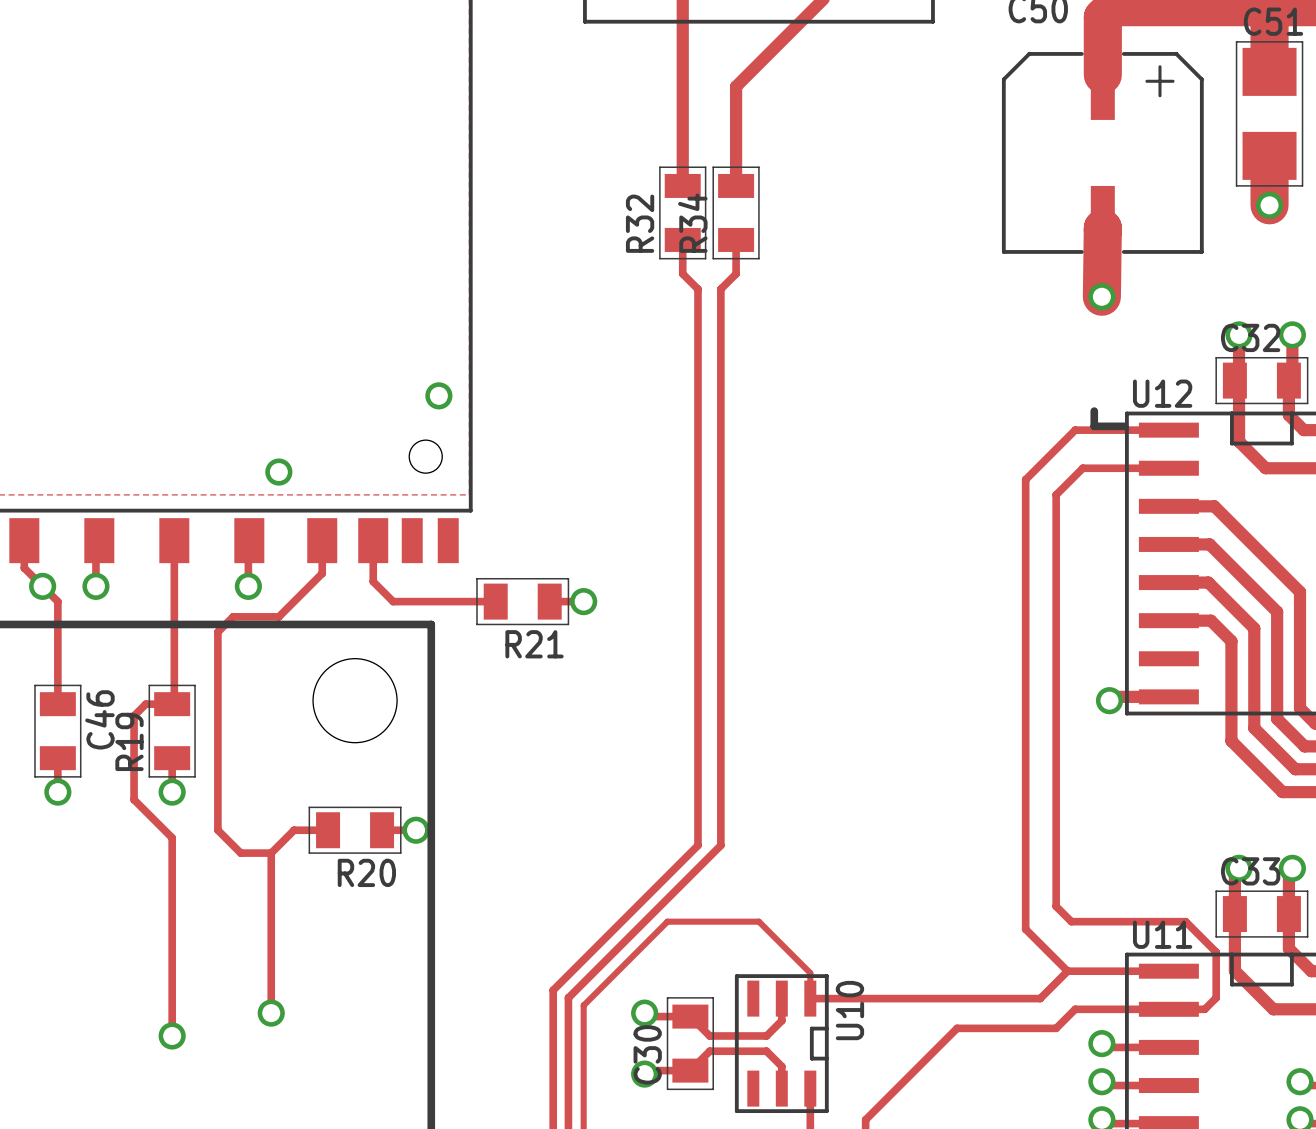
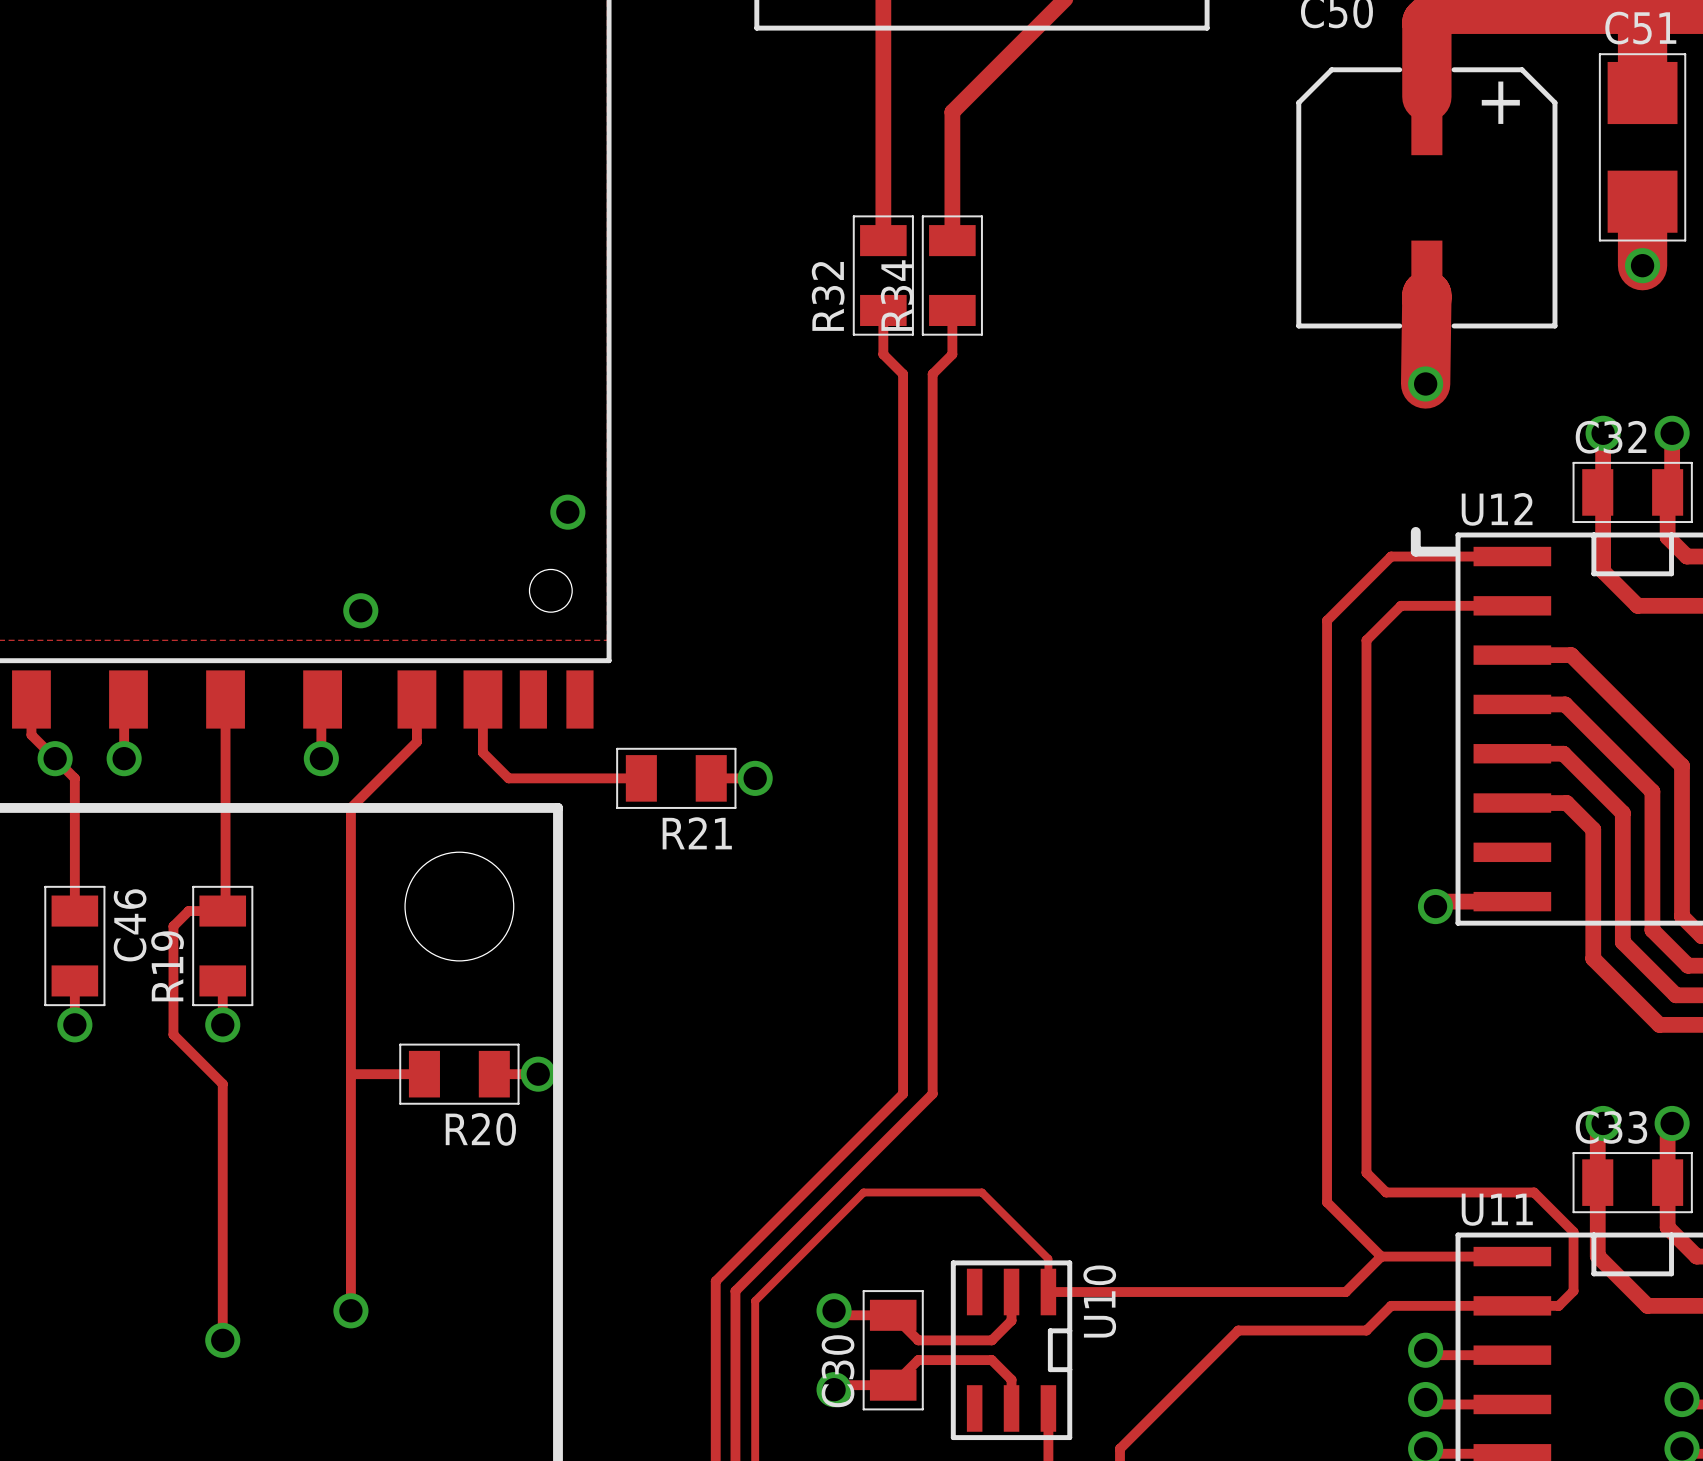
track: (278, 616) (233, 616) (217, 632) (217, 830) (240, 853) (271, 853) (294, 830) -> (360, 798) (350, 807) (350, 1103)
track: none -> (350, 1074) (380, 1074)

